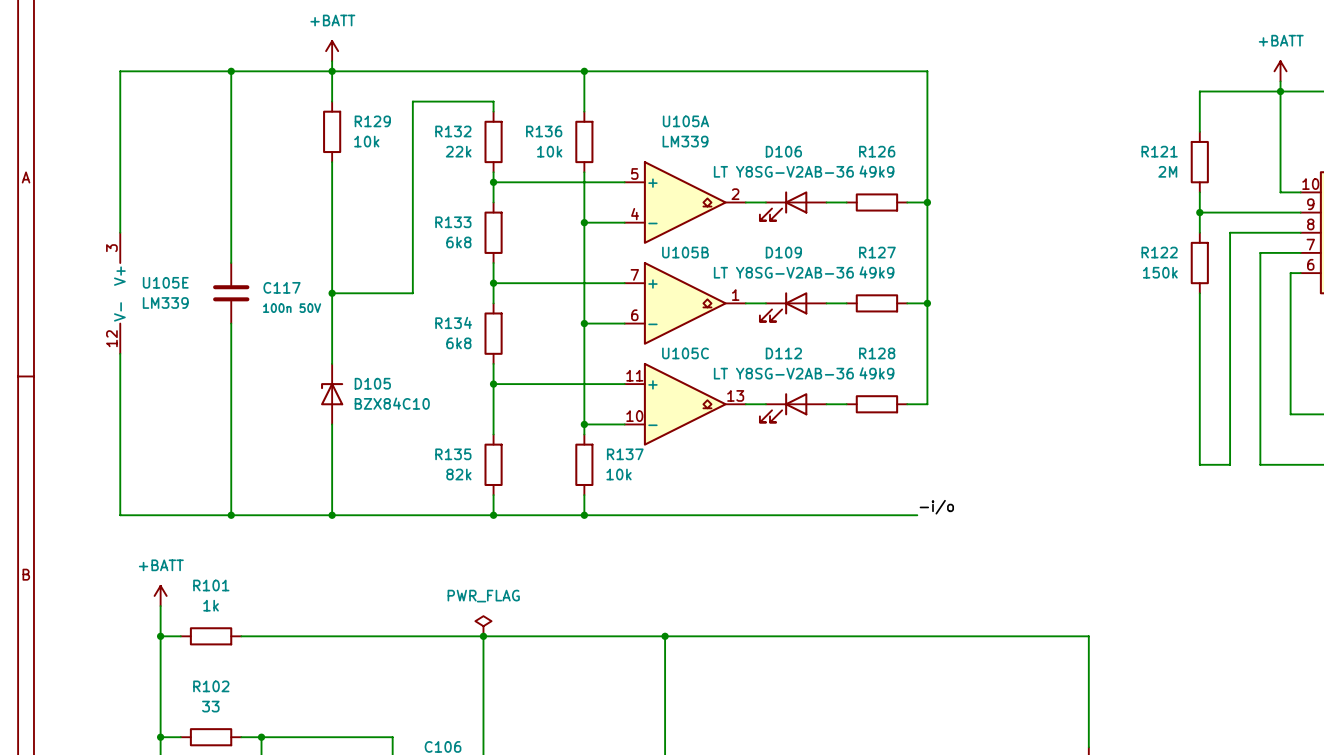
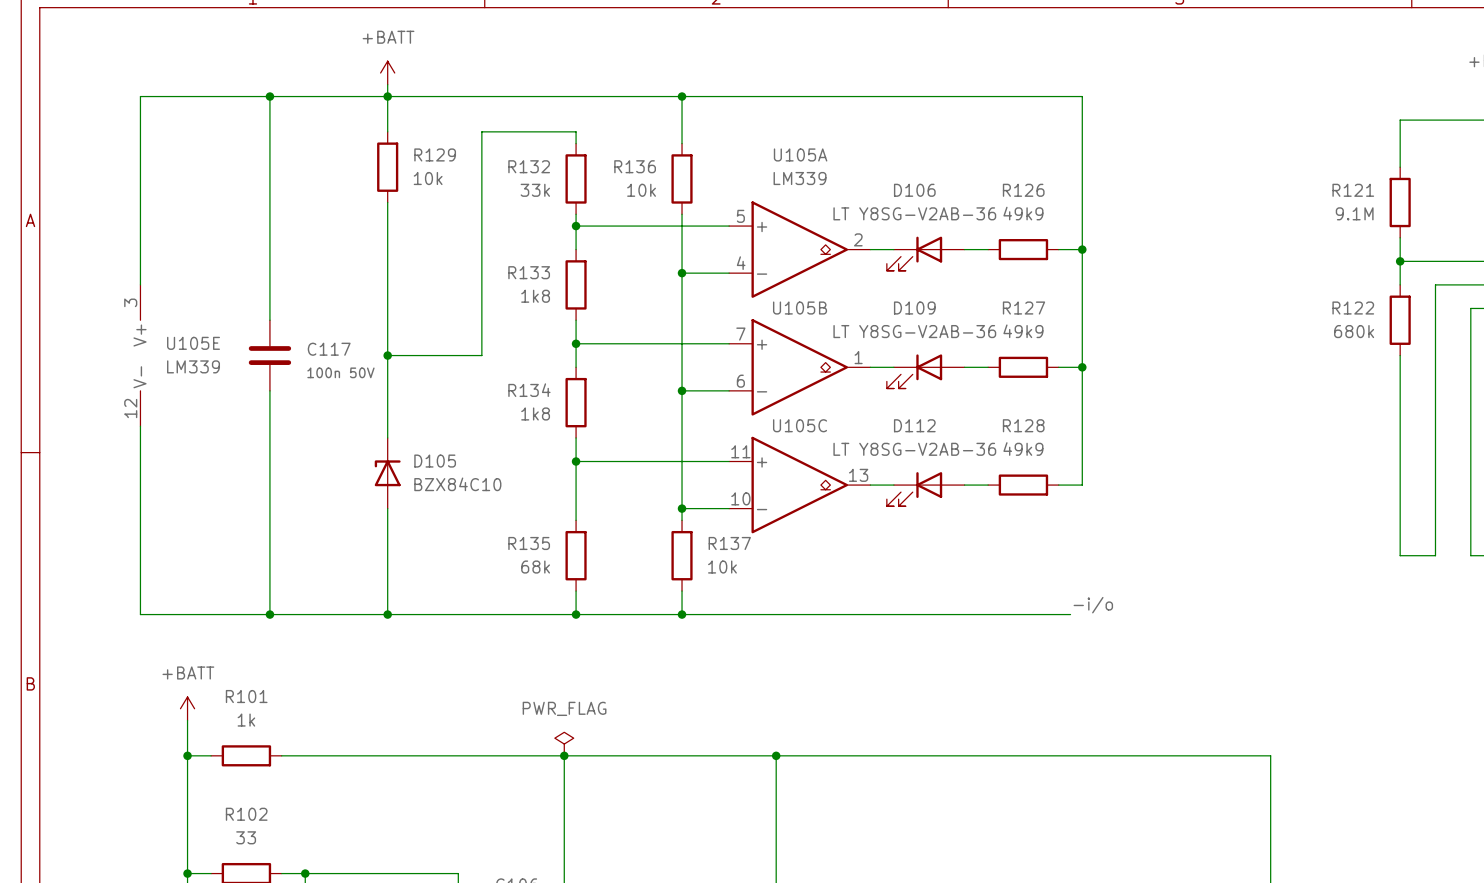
R132 value: 22k (458, 151) -> 33k (535, 190)
R121 value: 2M (1167, 171) -> 9.1M (1354, 213)
R133 value: 6k8 (458, 242) -> 1k8 (535, 296)
R122 value: 150k (1160, 272) -> 680k (1354, 331)
R134 value: 6k8 (458, 343) -> 1k8 (535, 413)
R135 value: 82k (458, 474) -> 68k (535, 567)

